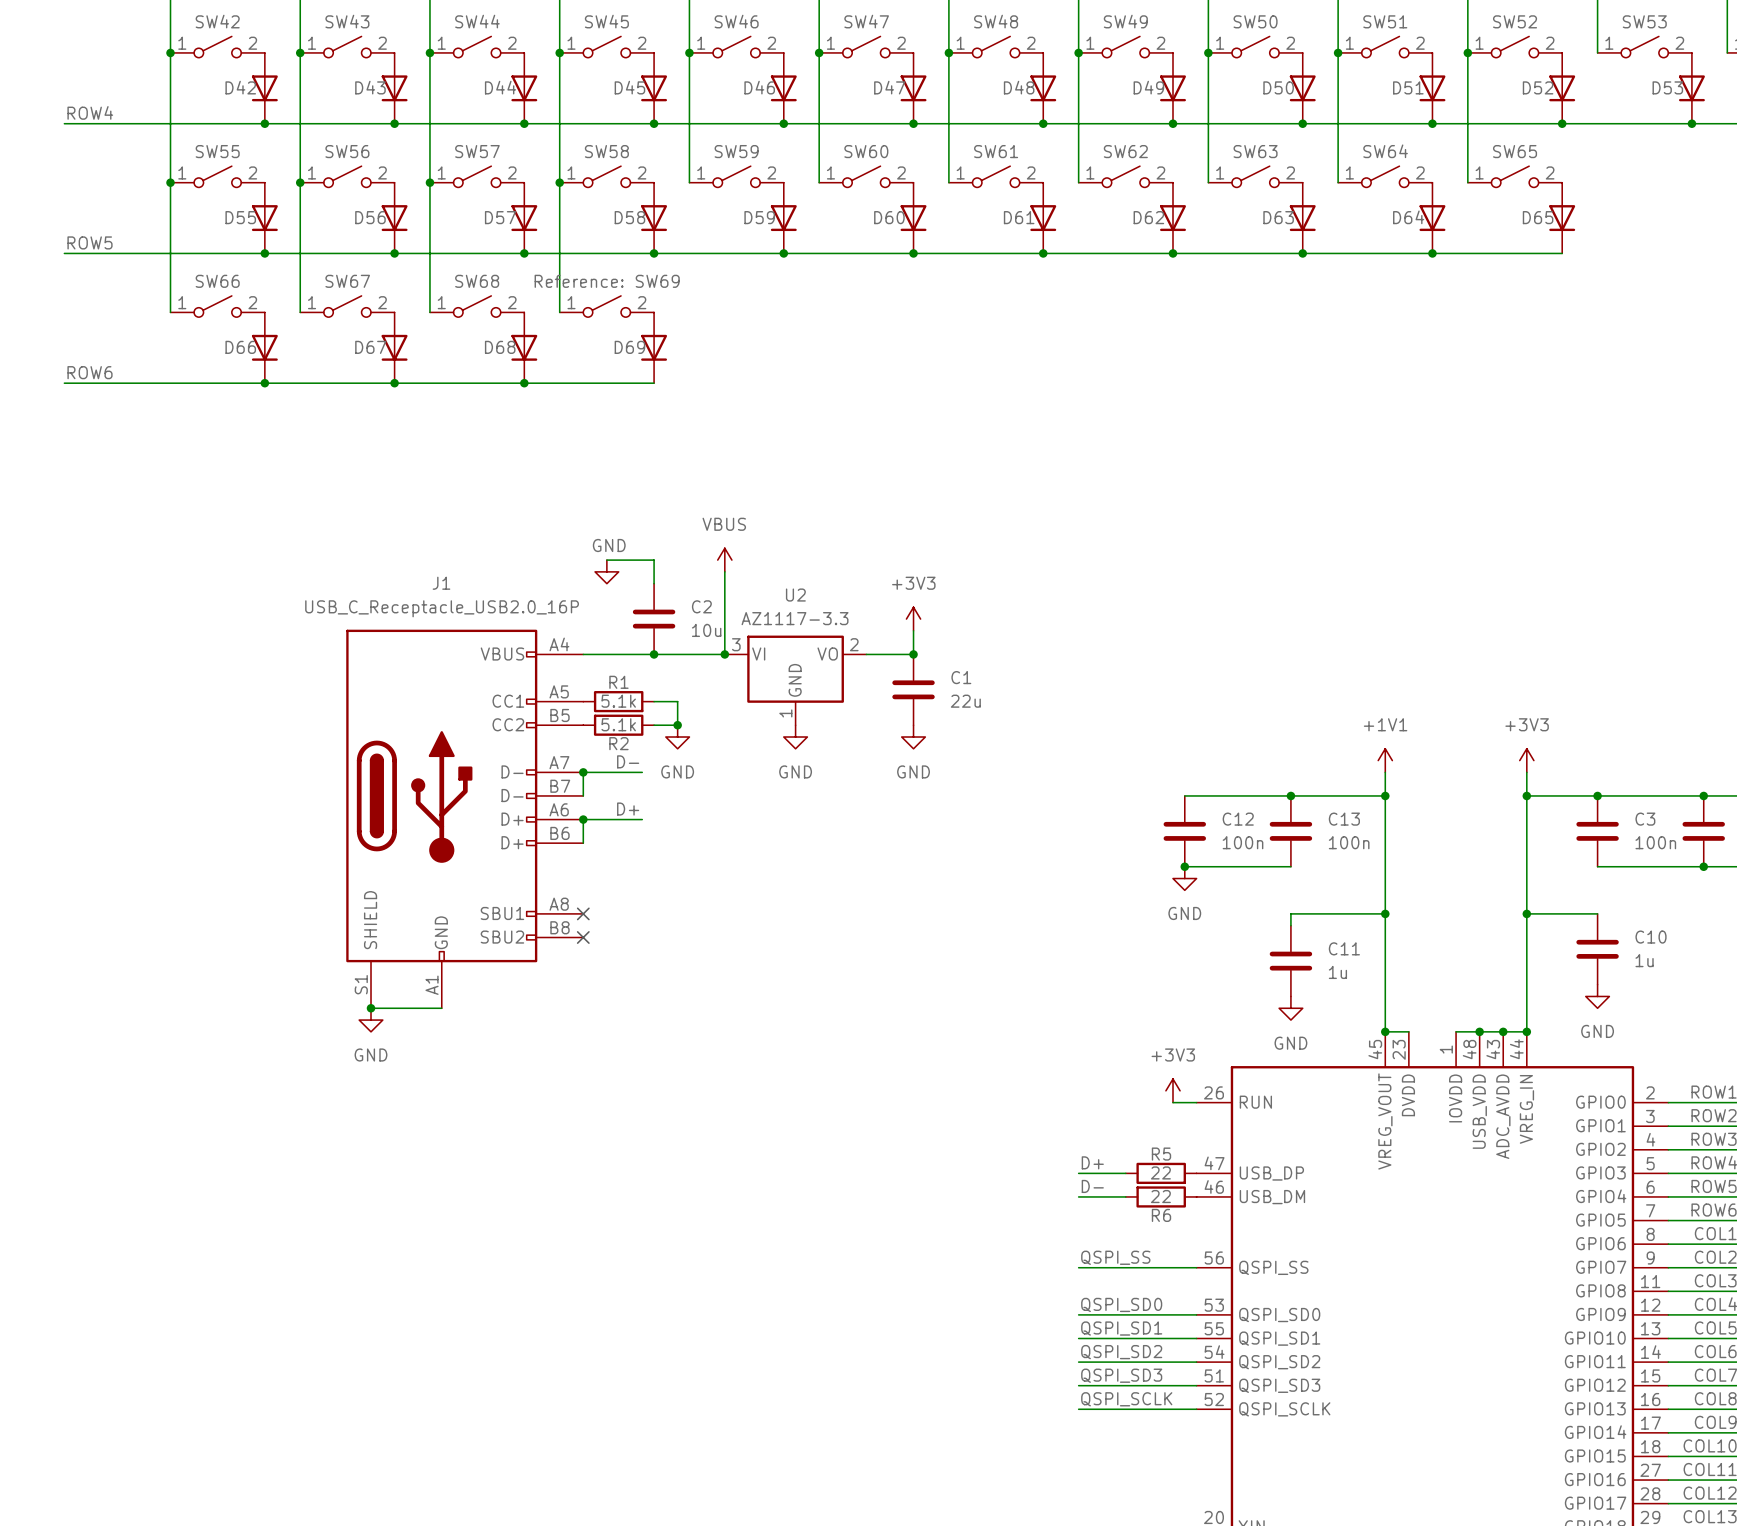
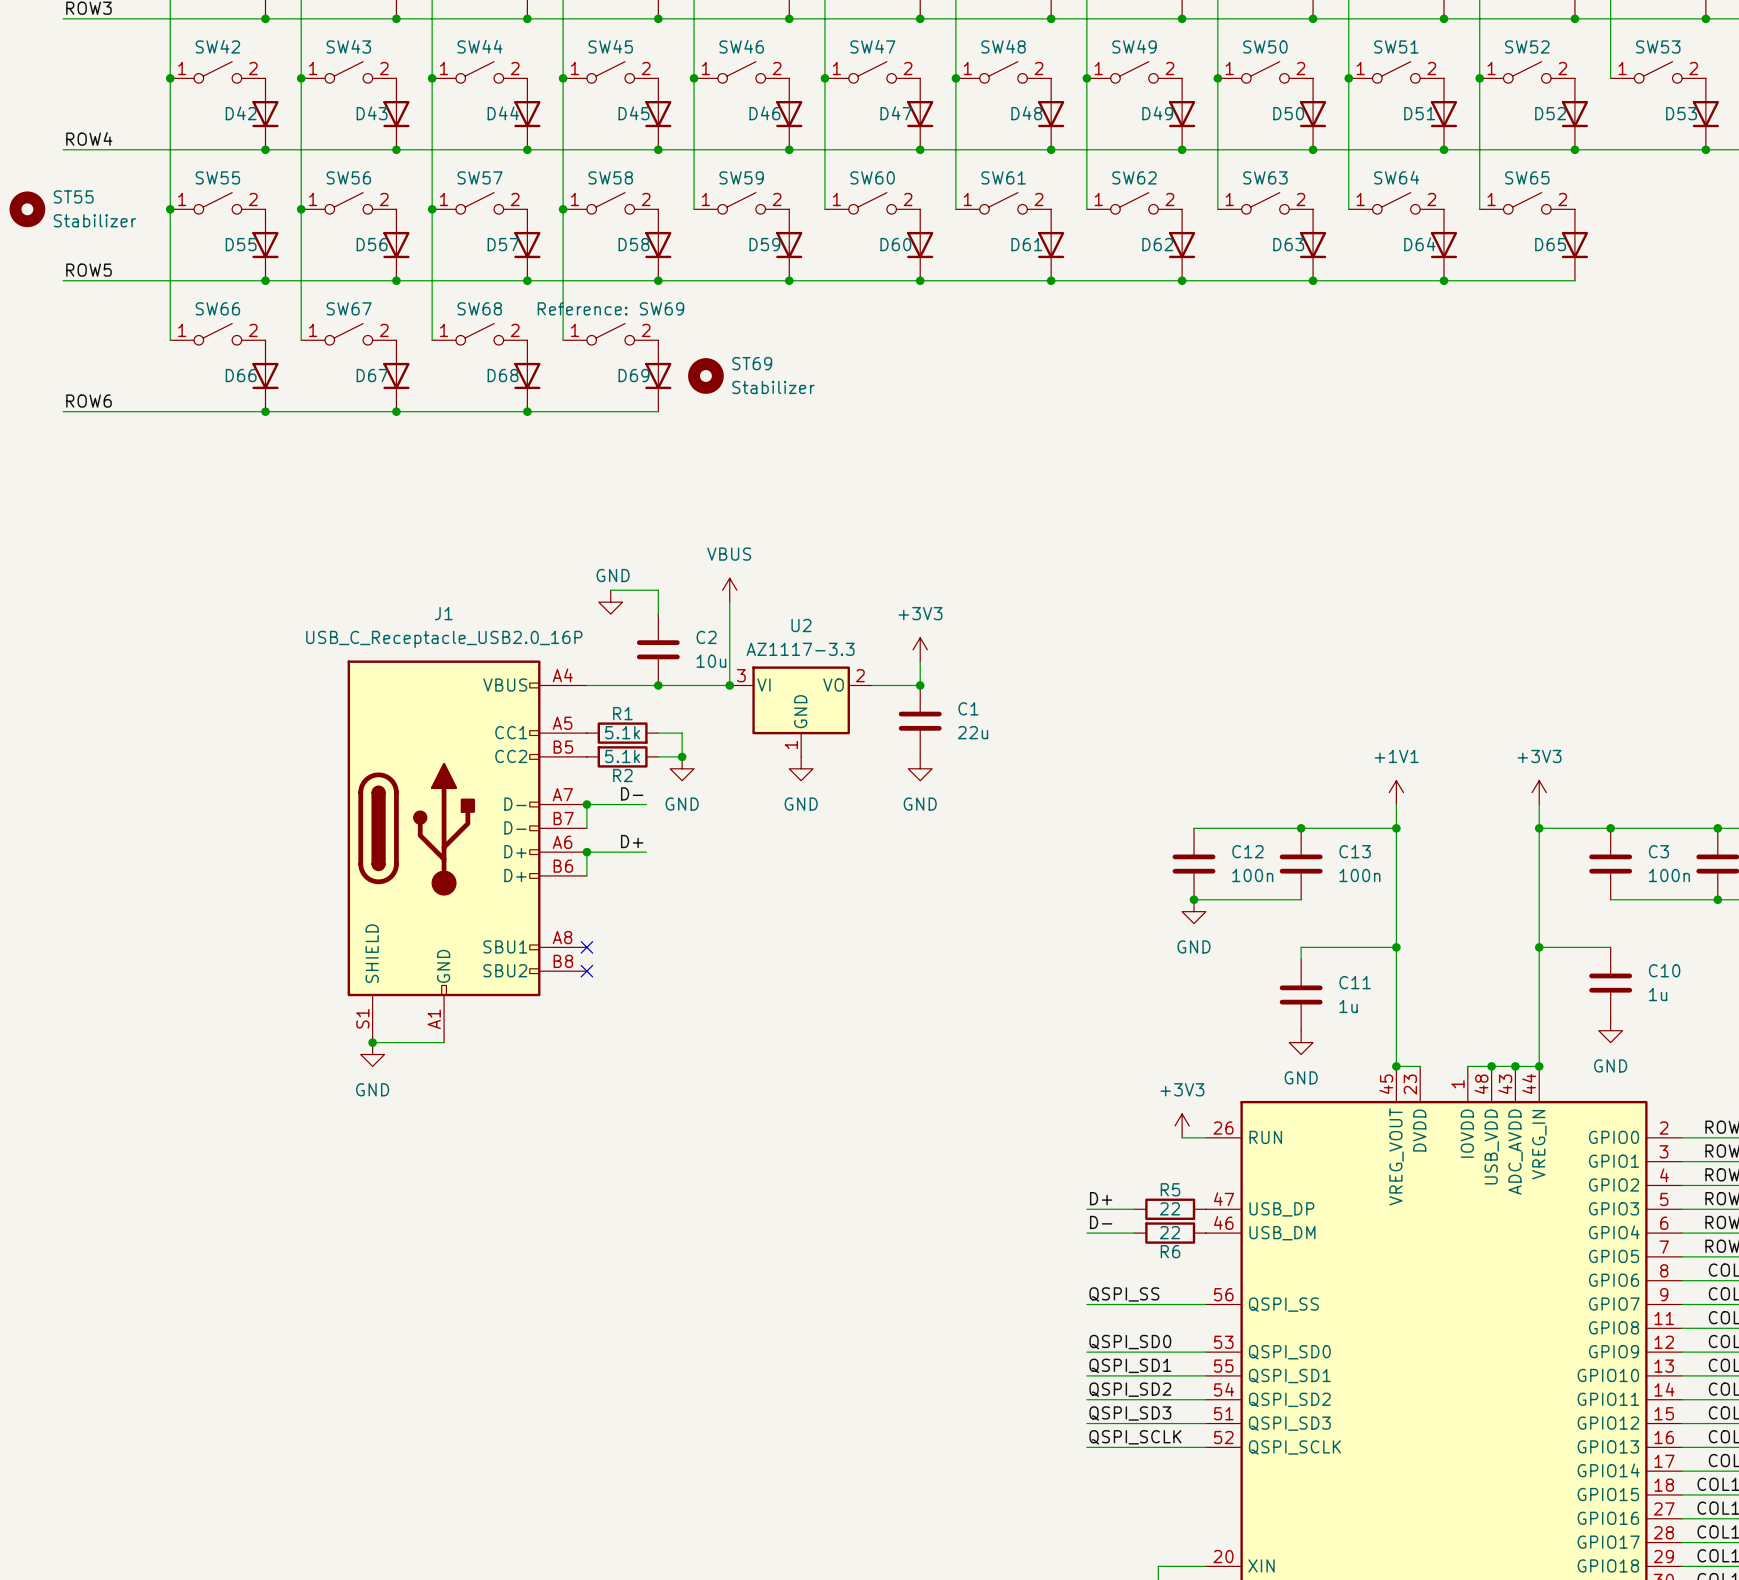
ST55: none -> Stabilizer (27, 209)
ST69: none -> Stabilizer (705, 375)

